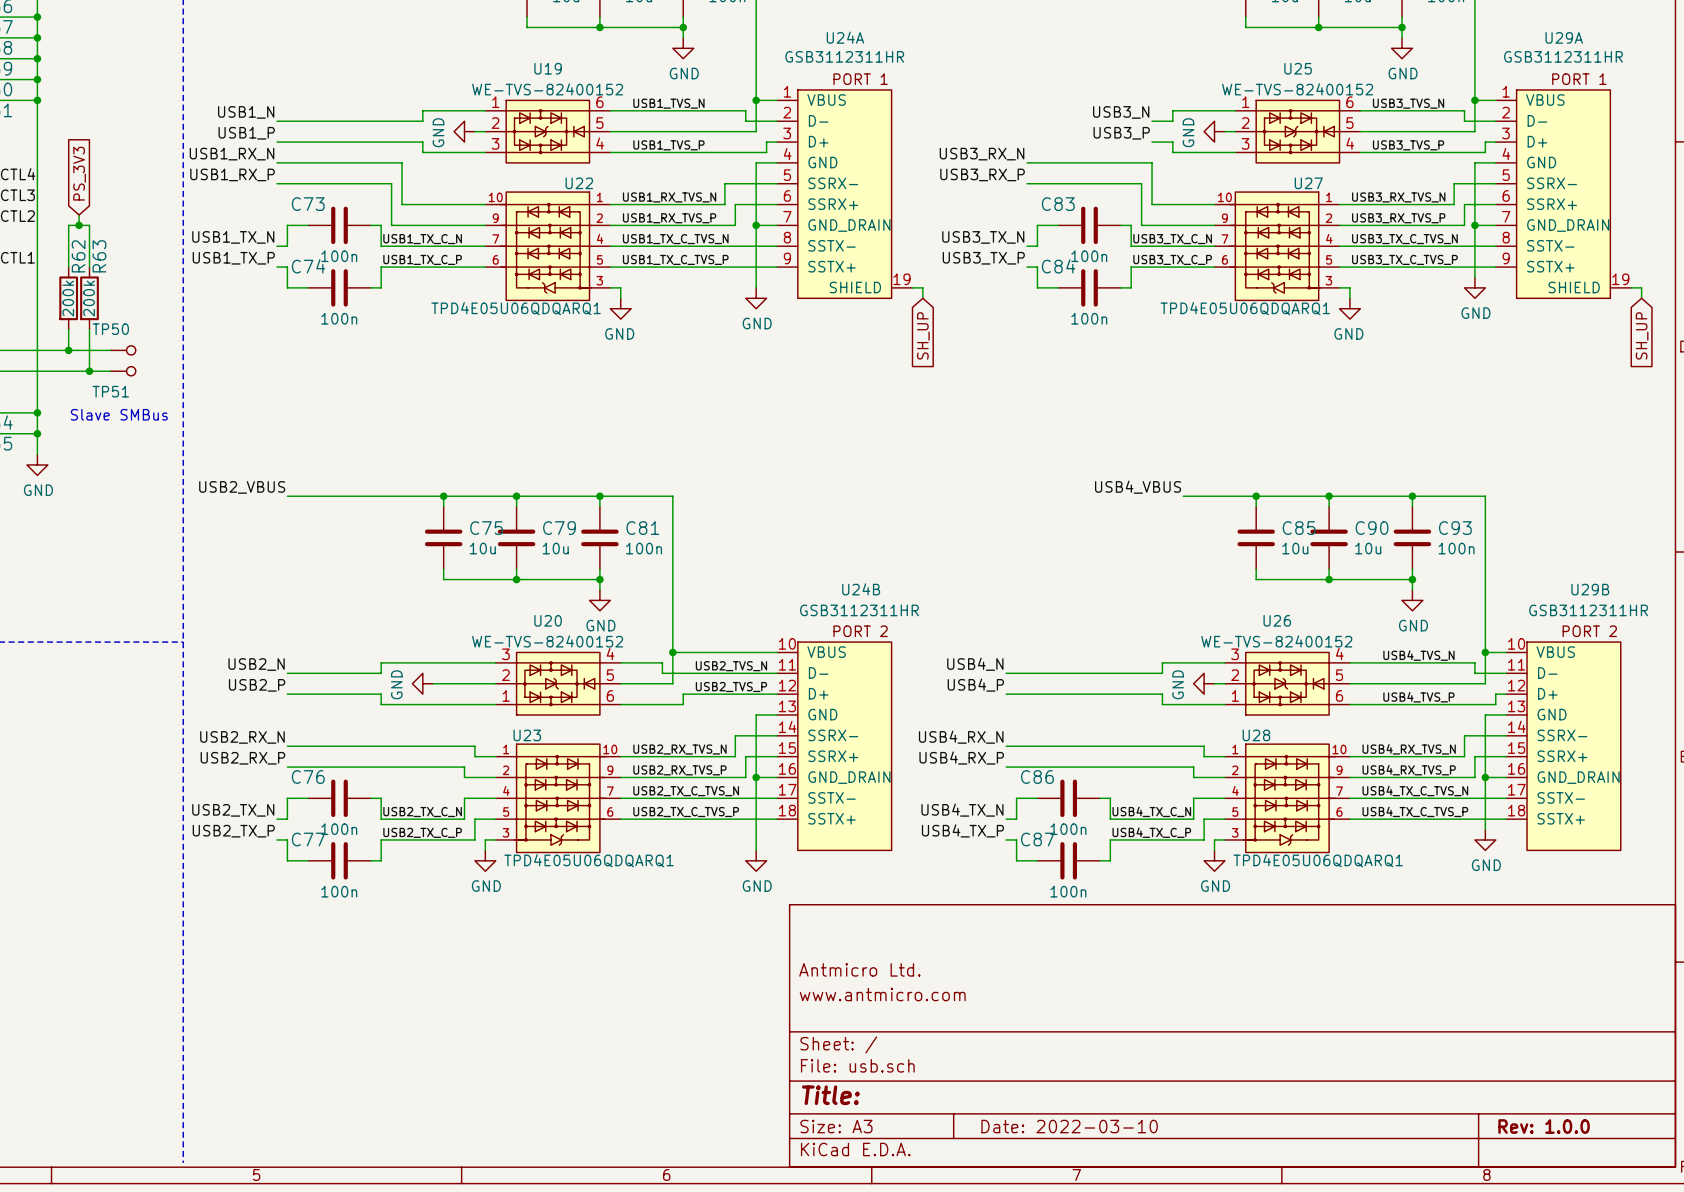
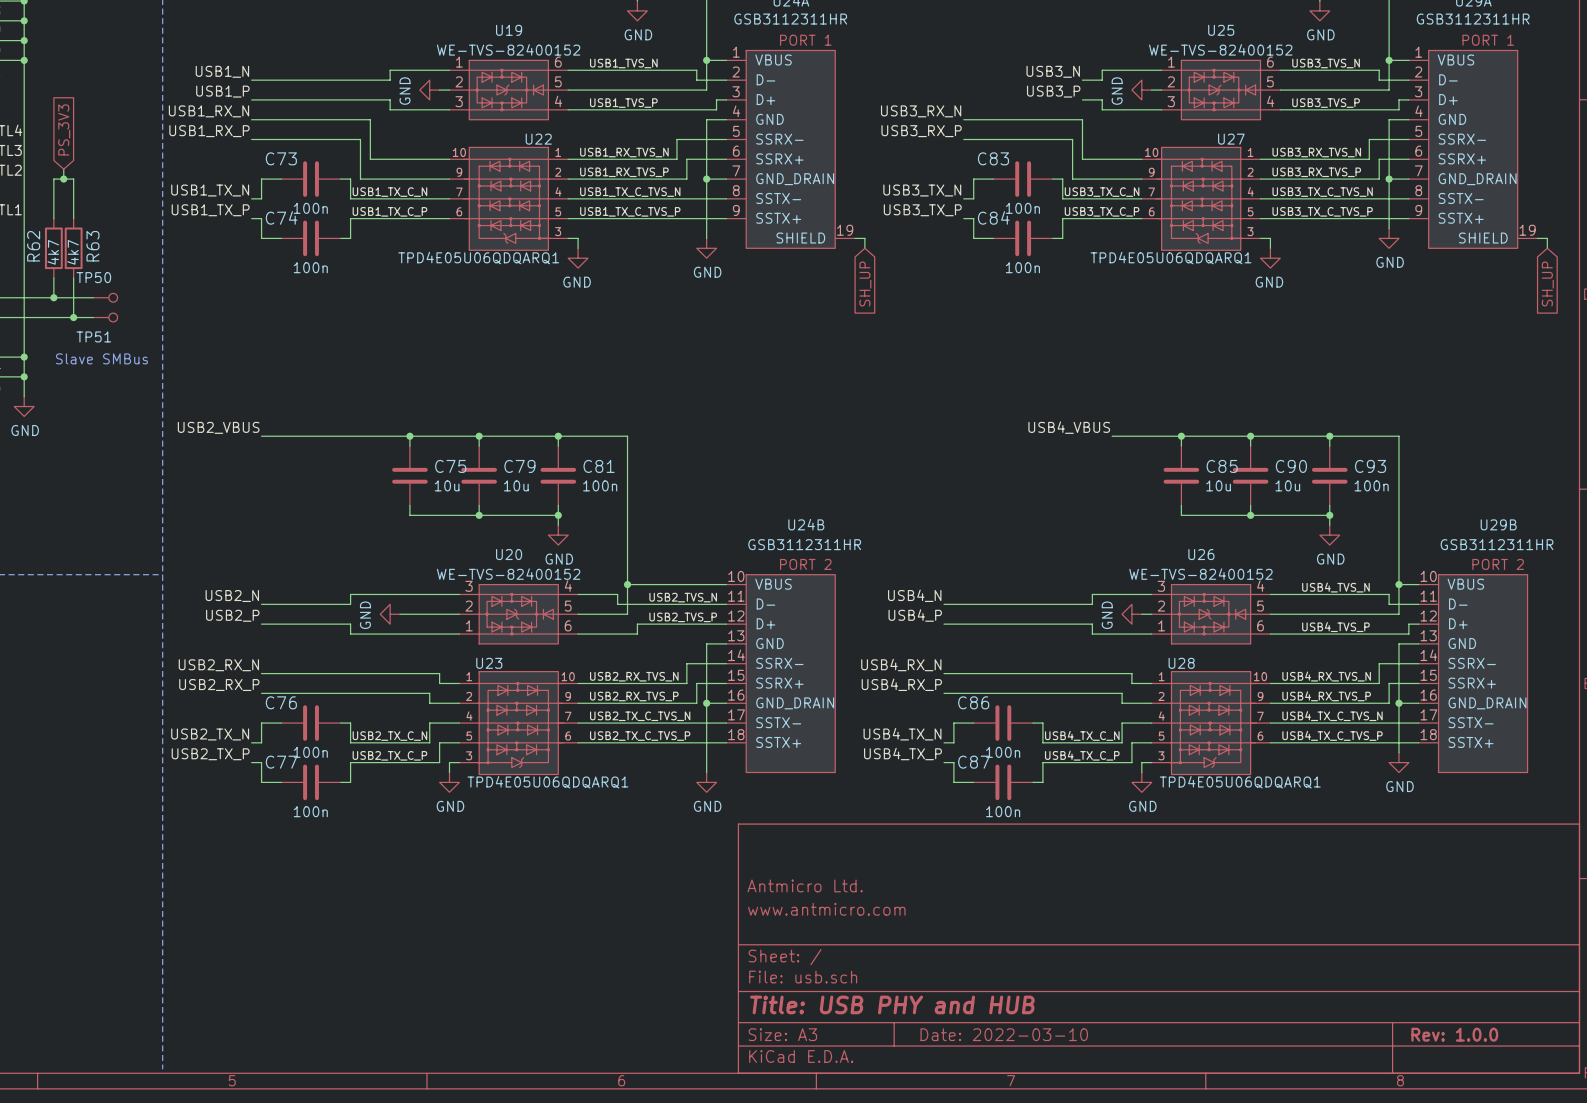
R62 name position: R62 (78, 256) -> R62 (33, 246)
R63 name position: R63 (99, 256) -> R63 (92, 246)
R62 text: 200k (68, 298) -> 4k7 (53, 252)
R63 text: 200k (89, 298) -> 4k7 (73, 252)
title block: Title: (830, 1095) -> Title: USB PHY and HUB (892, 1004)

